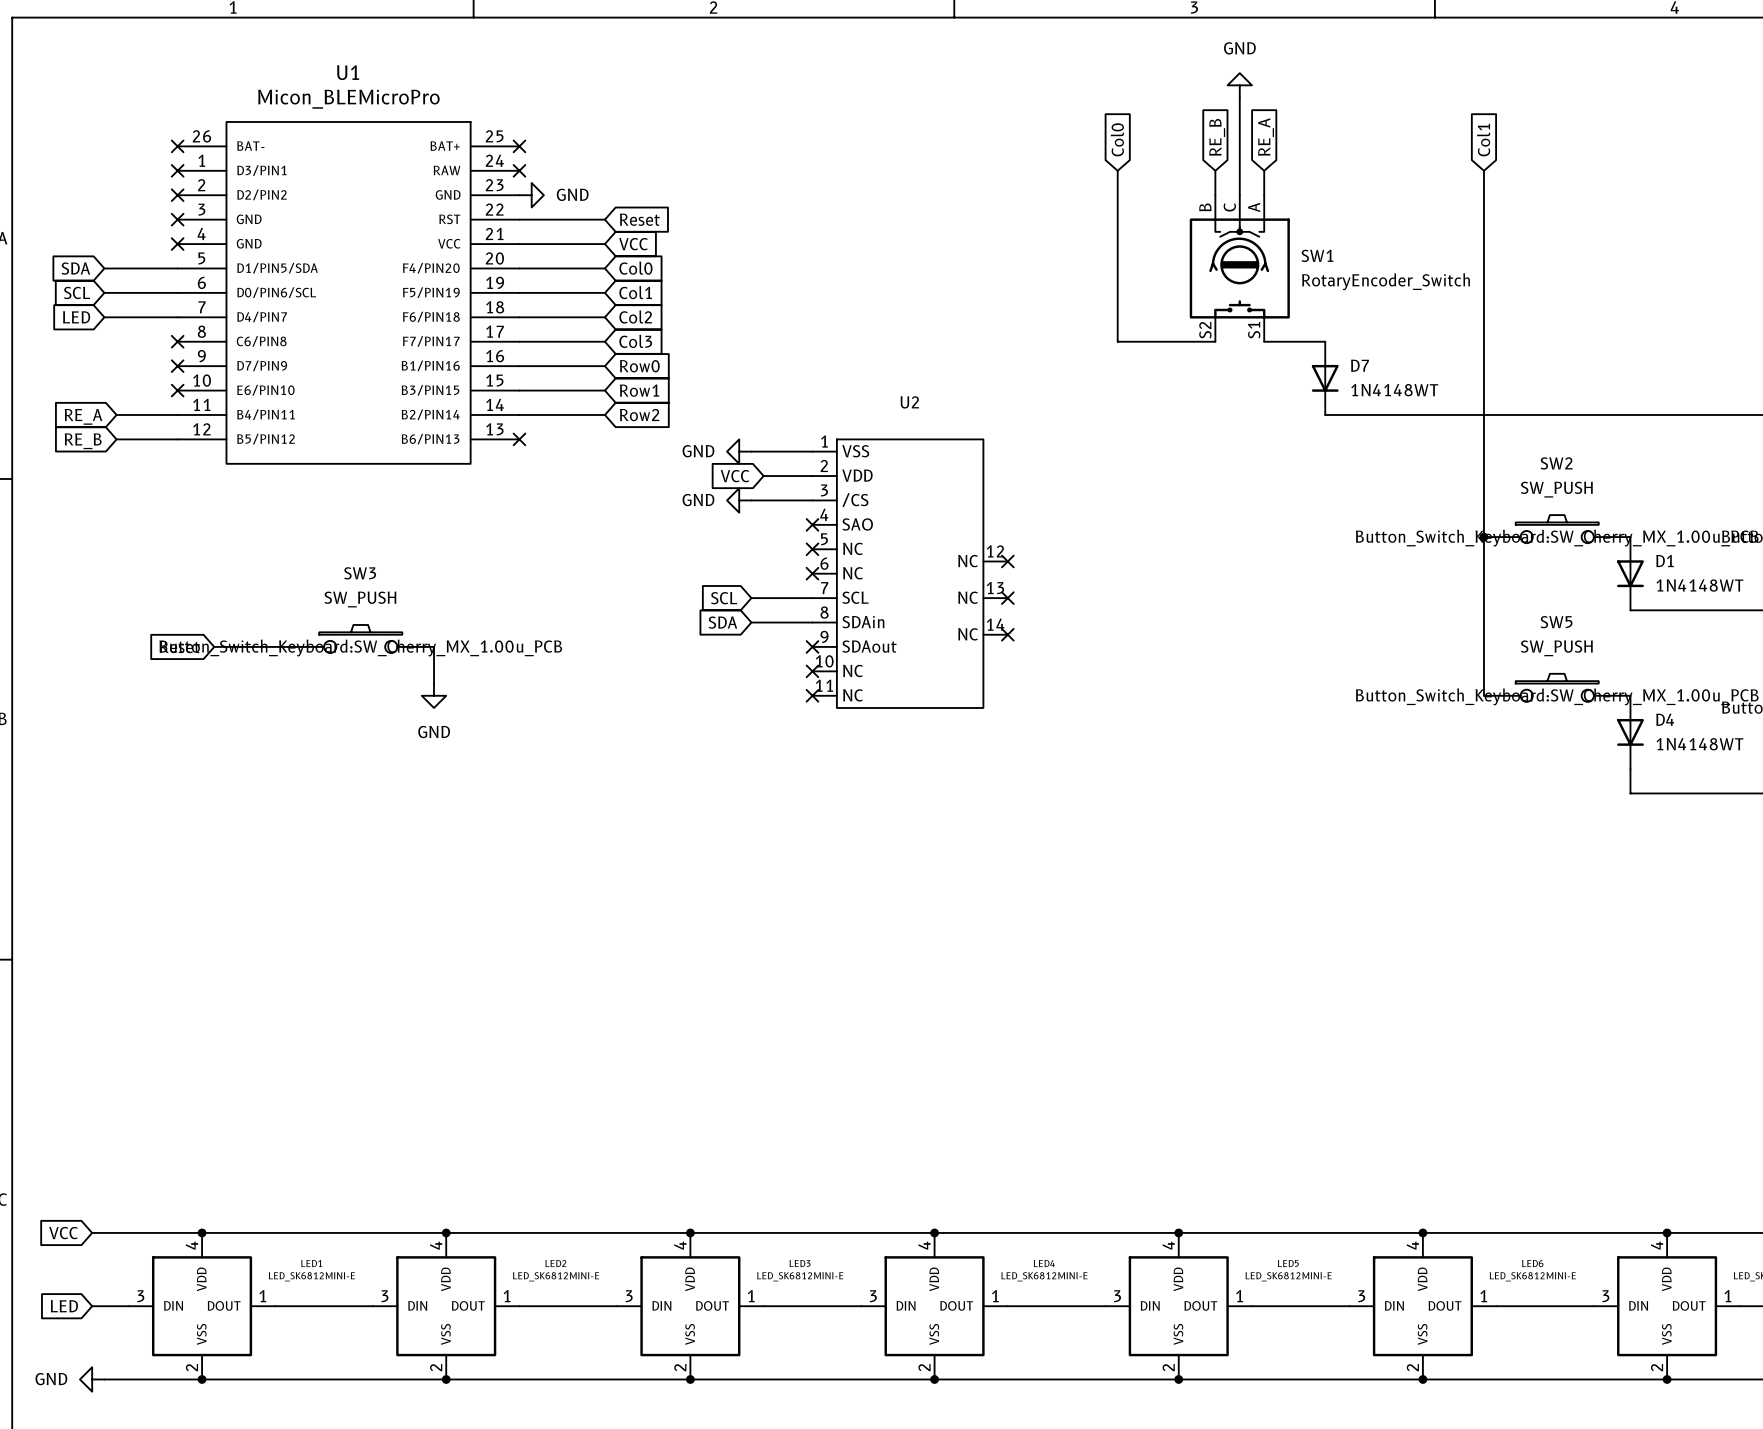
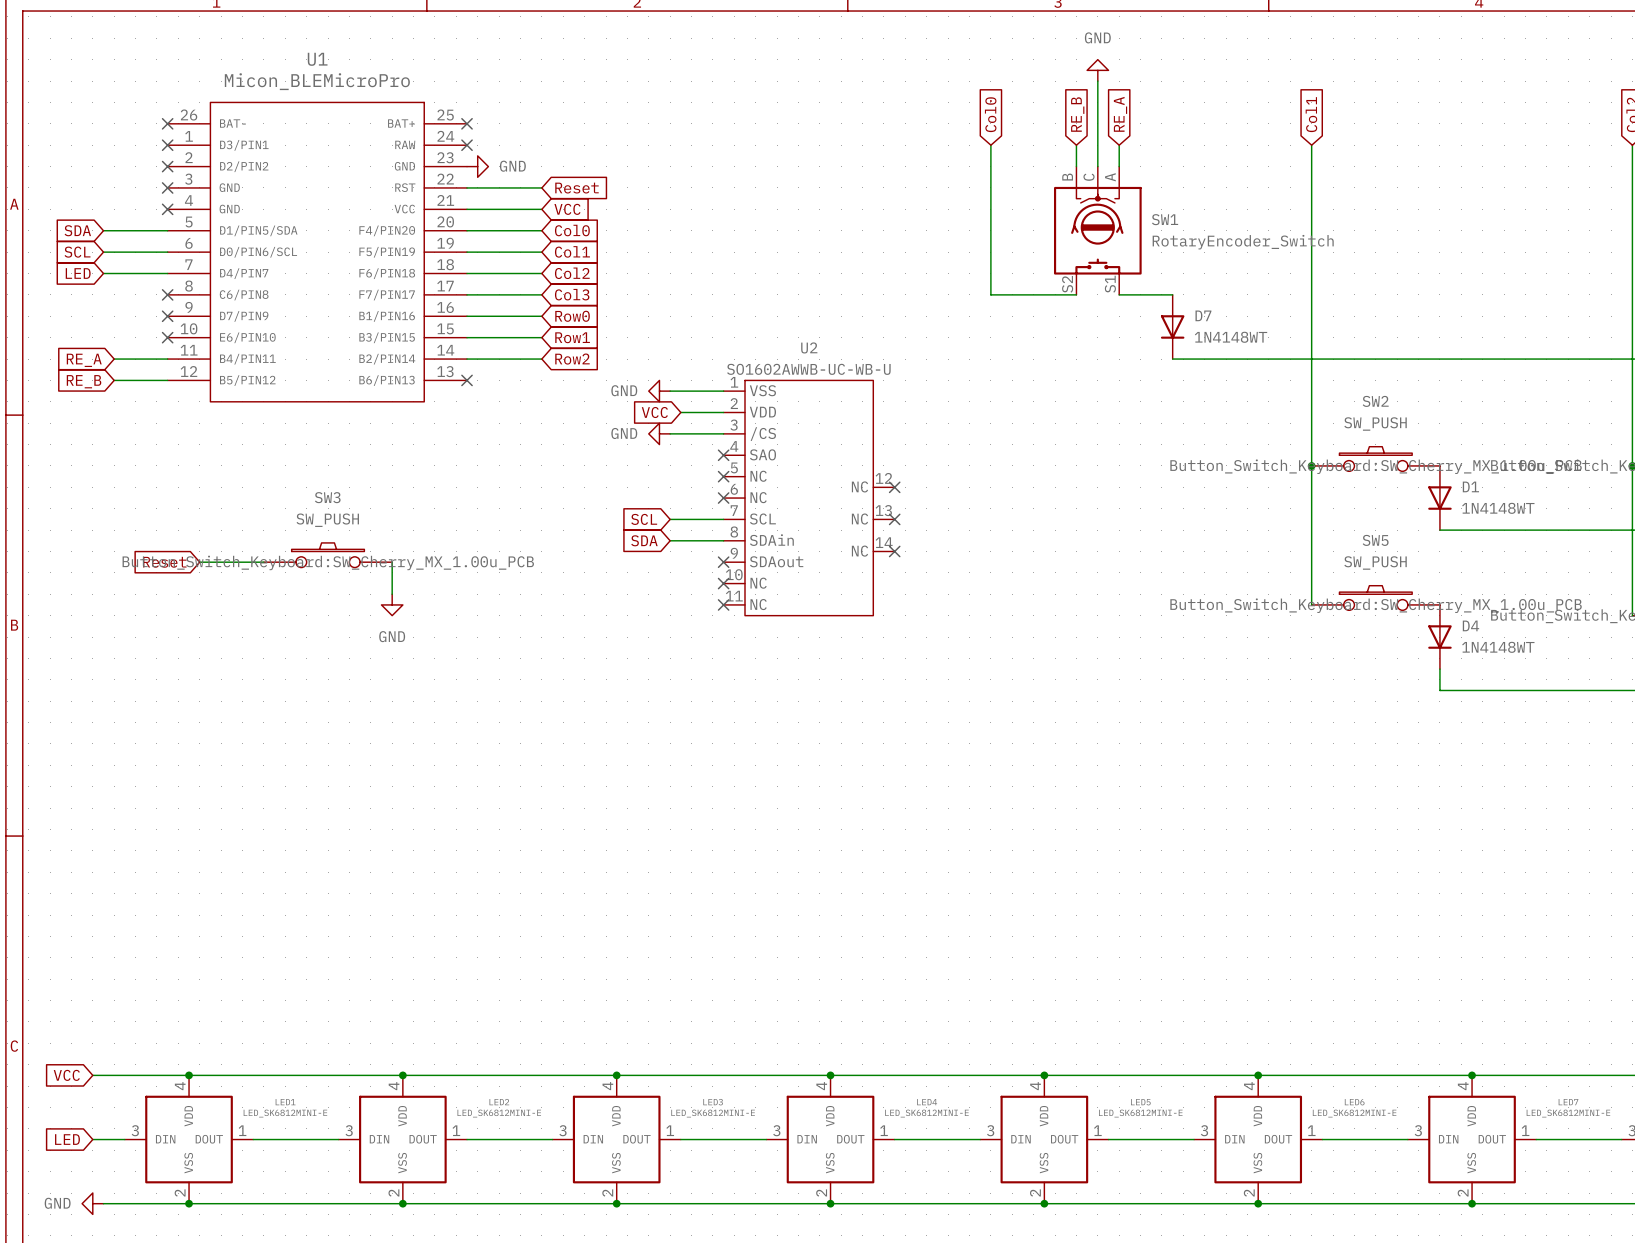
U2 value: none -> SO1602AWWB-UC-WB-U (808, 369)

